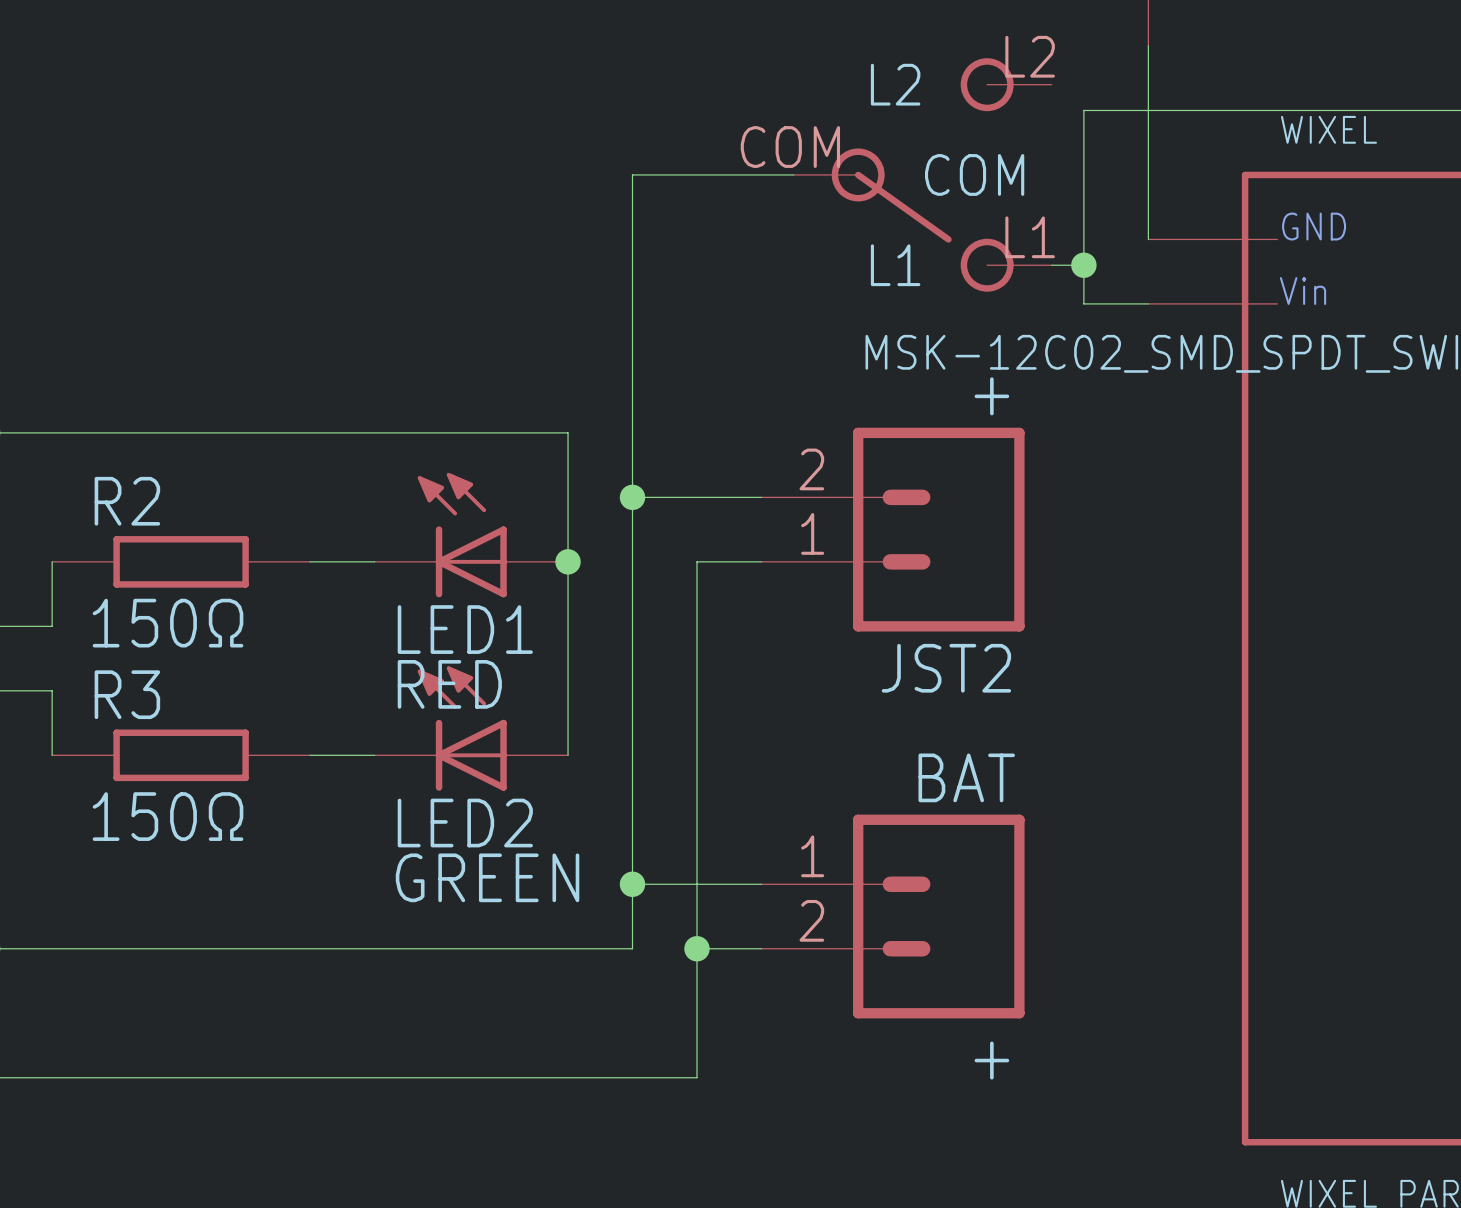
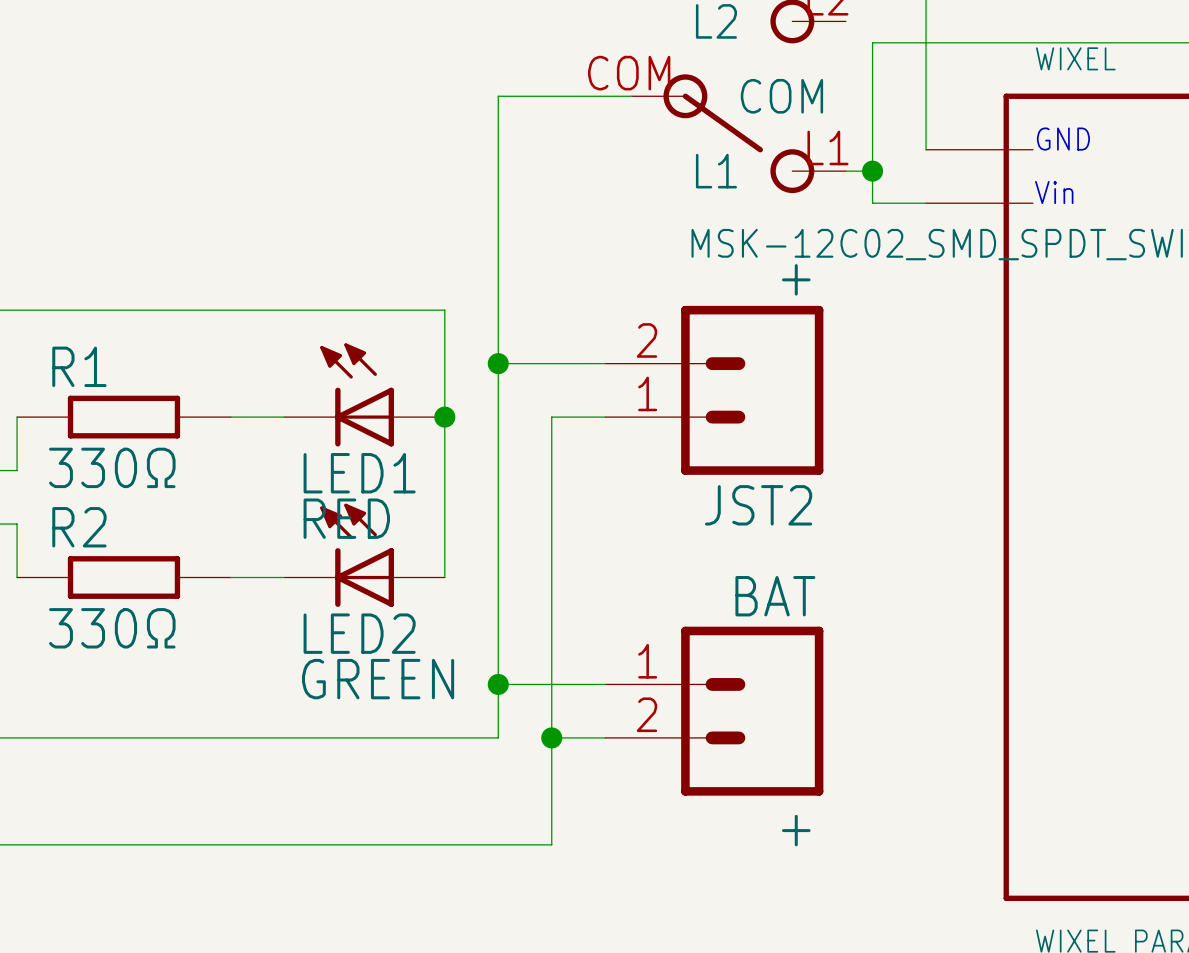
R2 name: R2 (127, 501) -> R1 (79, 366)
R2 value: 150Ω (168, 623) -> 330Ω (112, 467)
R3 name: R3 (127, 694) -> R2 (79, 527)
R3 value: 150Ω (168, 816) -> 330Ω (112, 628)

